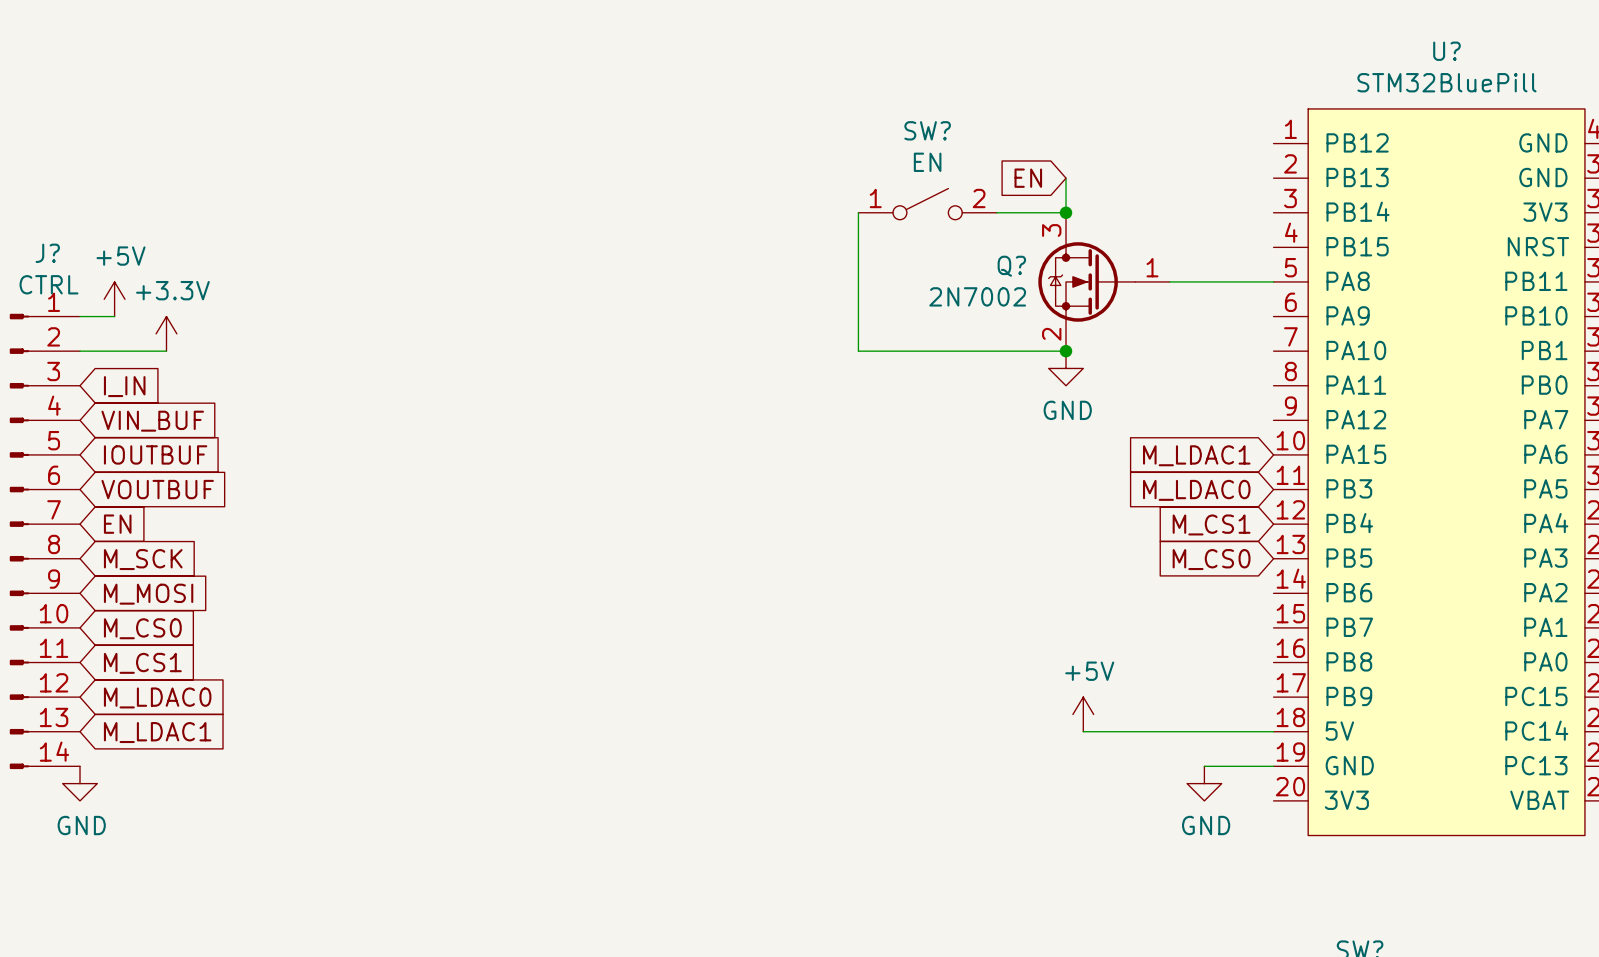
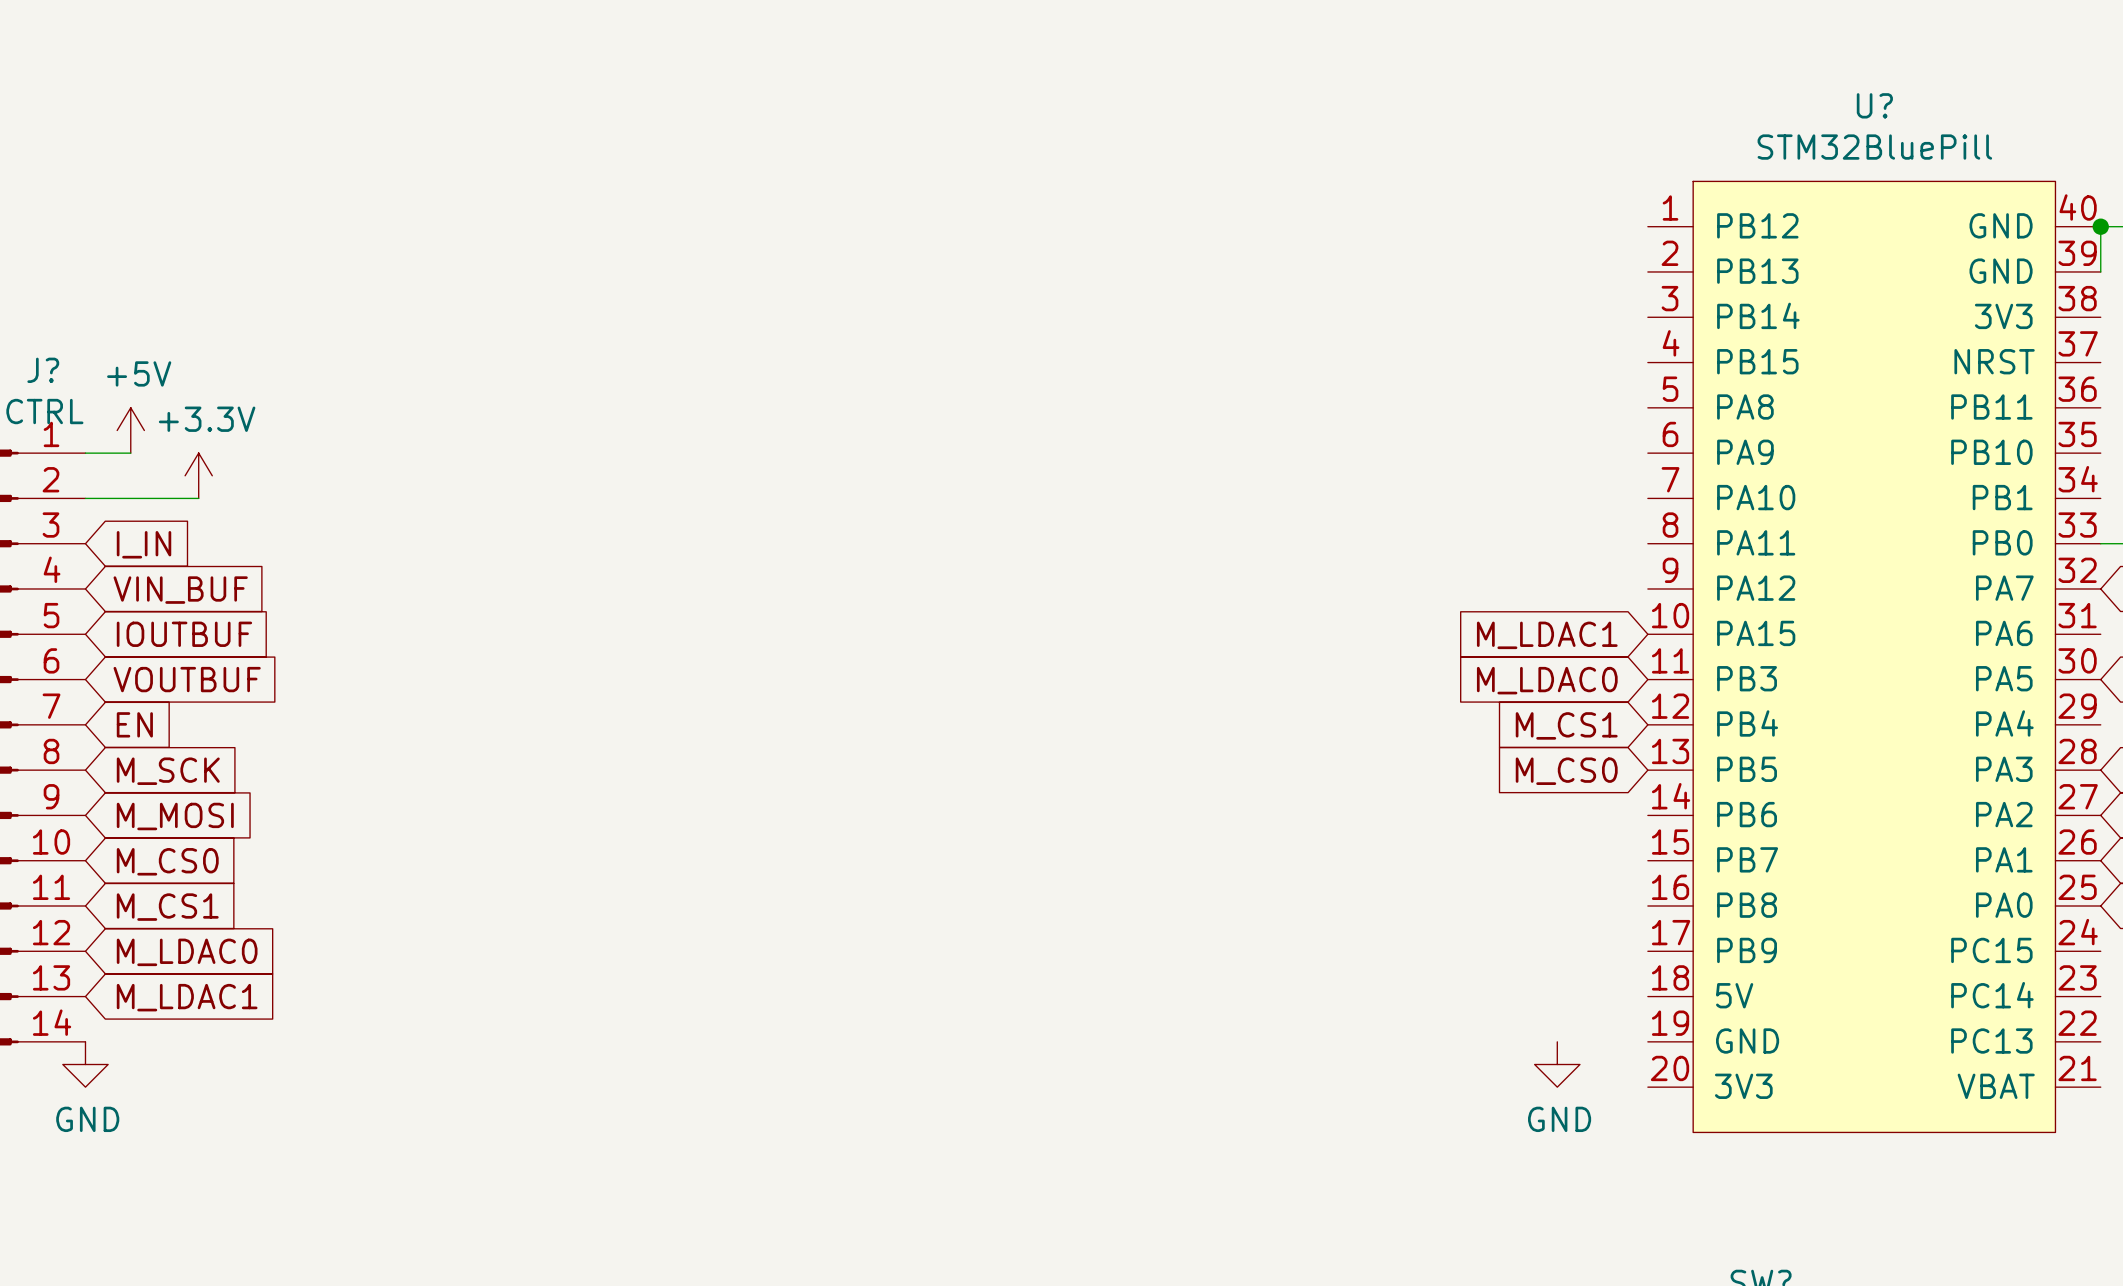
global label: EN (1028, 178) -> none
wire: (1066, 178) (1066, 212) (996, 212) -> none
SW?: EN (927, 204) -> none
wire: (858, 212) (858, 351) (1066, 351) -> none
junction: (1066, 212) -> none
Q?: 2N7002 (1104, 281) -> none
wire: (1169, 281) (1273, 281) -> none
junction: (1066, 351) -> none
power symbol: GND (1066, 368) -> none
power symbol: +5V (1083, 714) -> none
wire: (1083, 731) (1273, 731) -> none
wire: (1204, 766) (1273, 766) -> none

